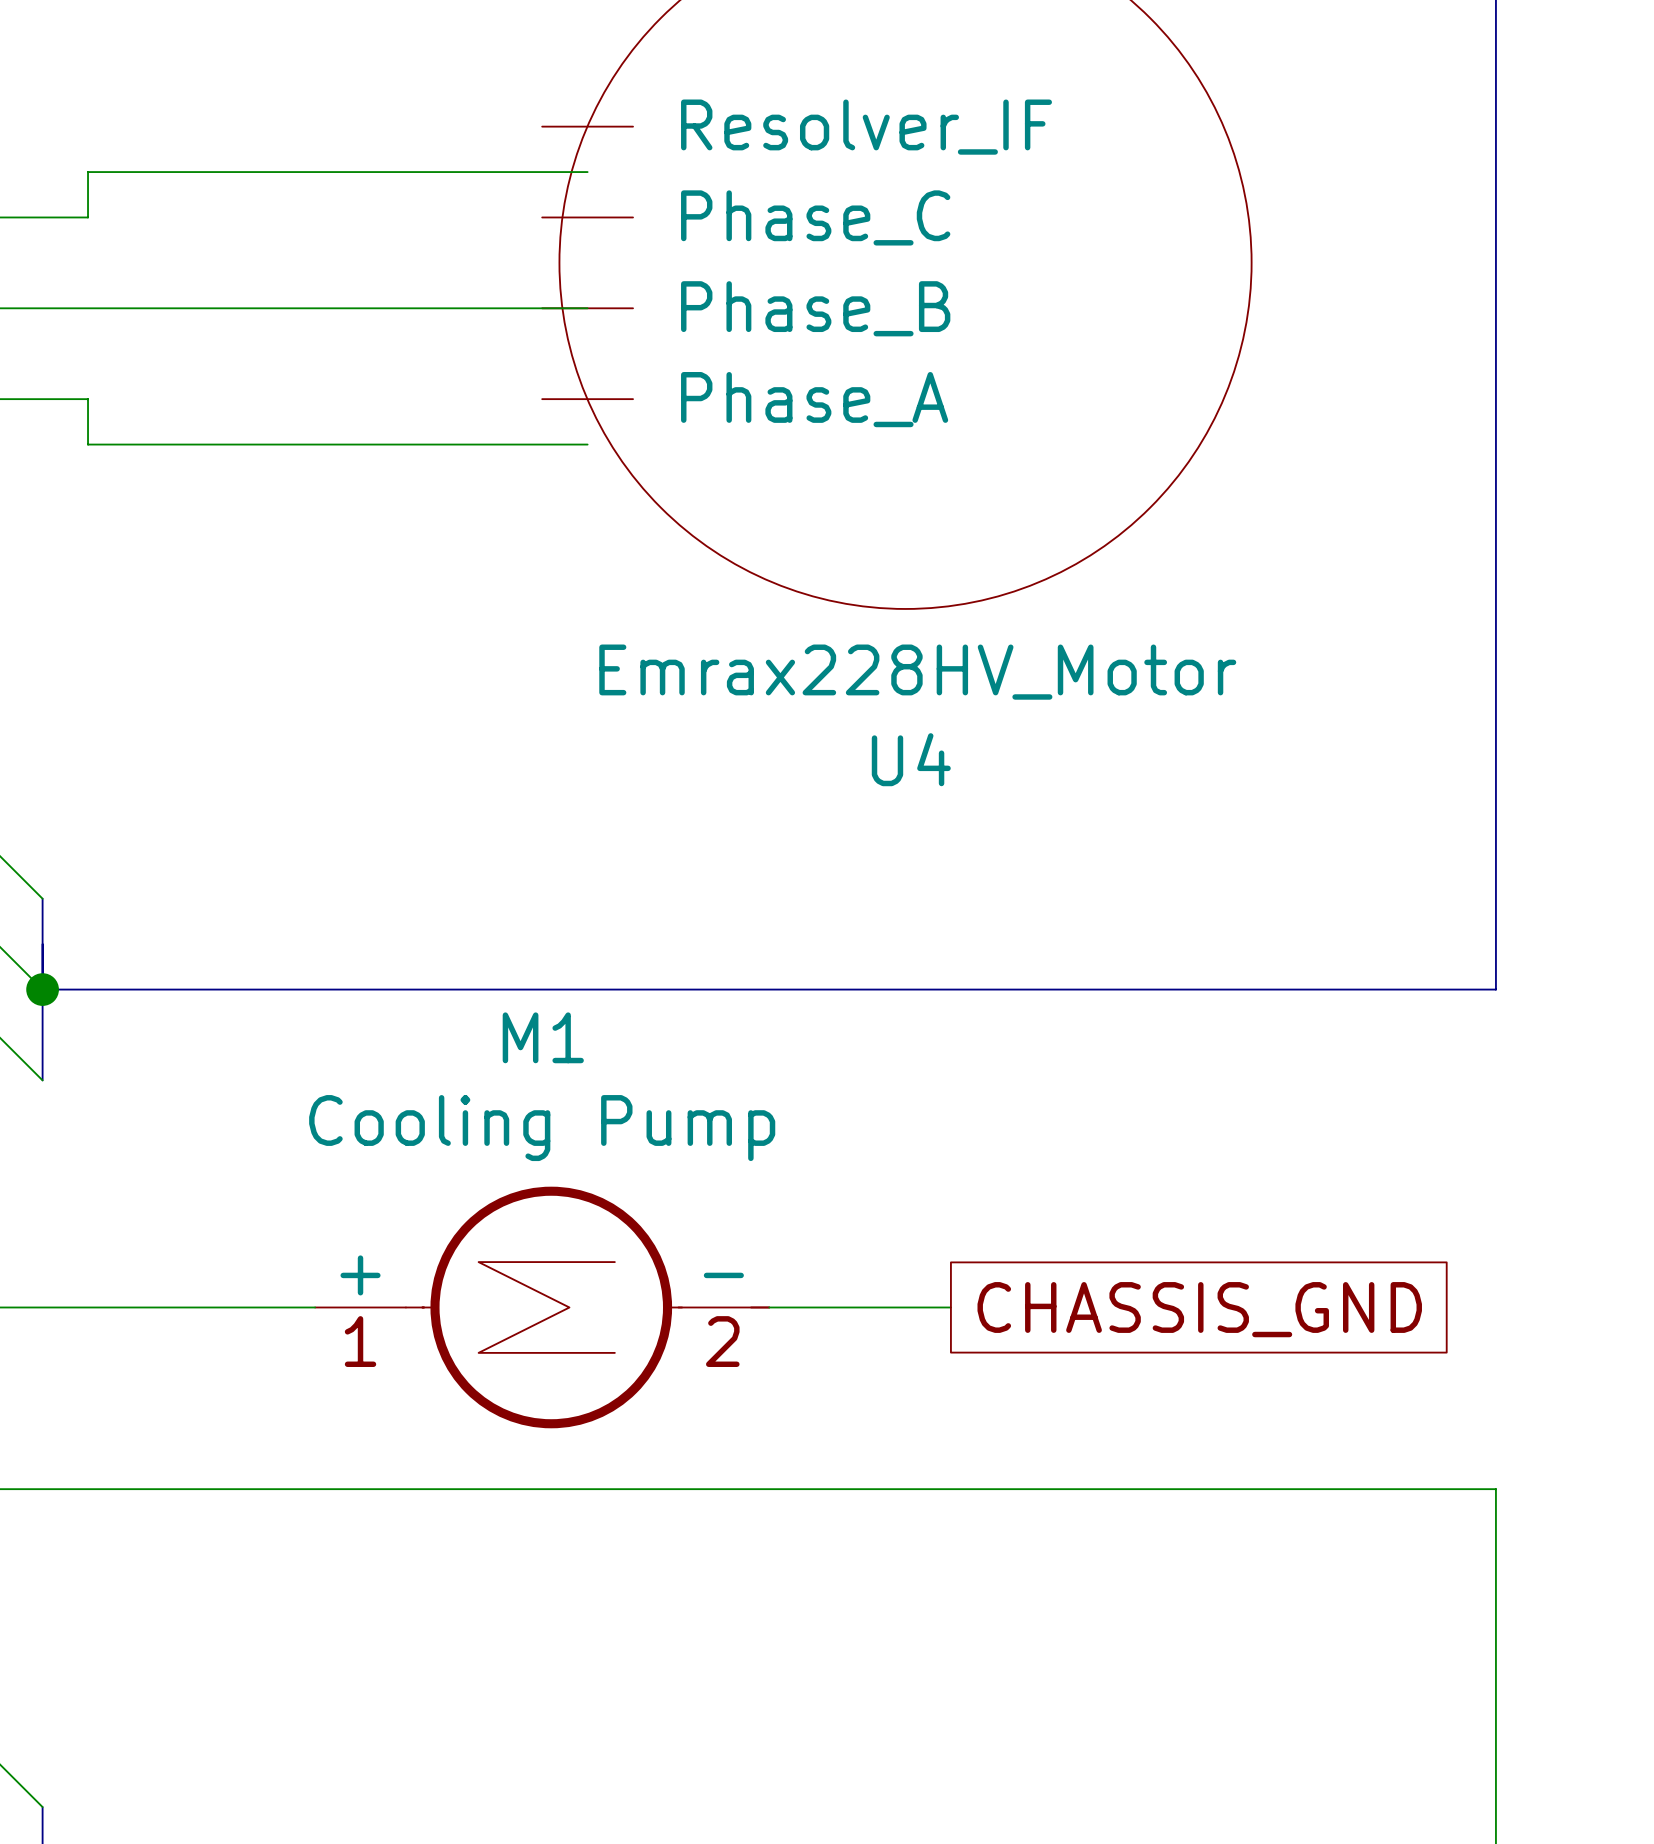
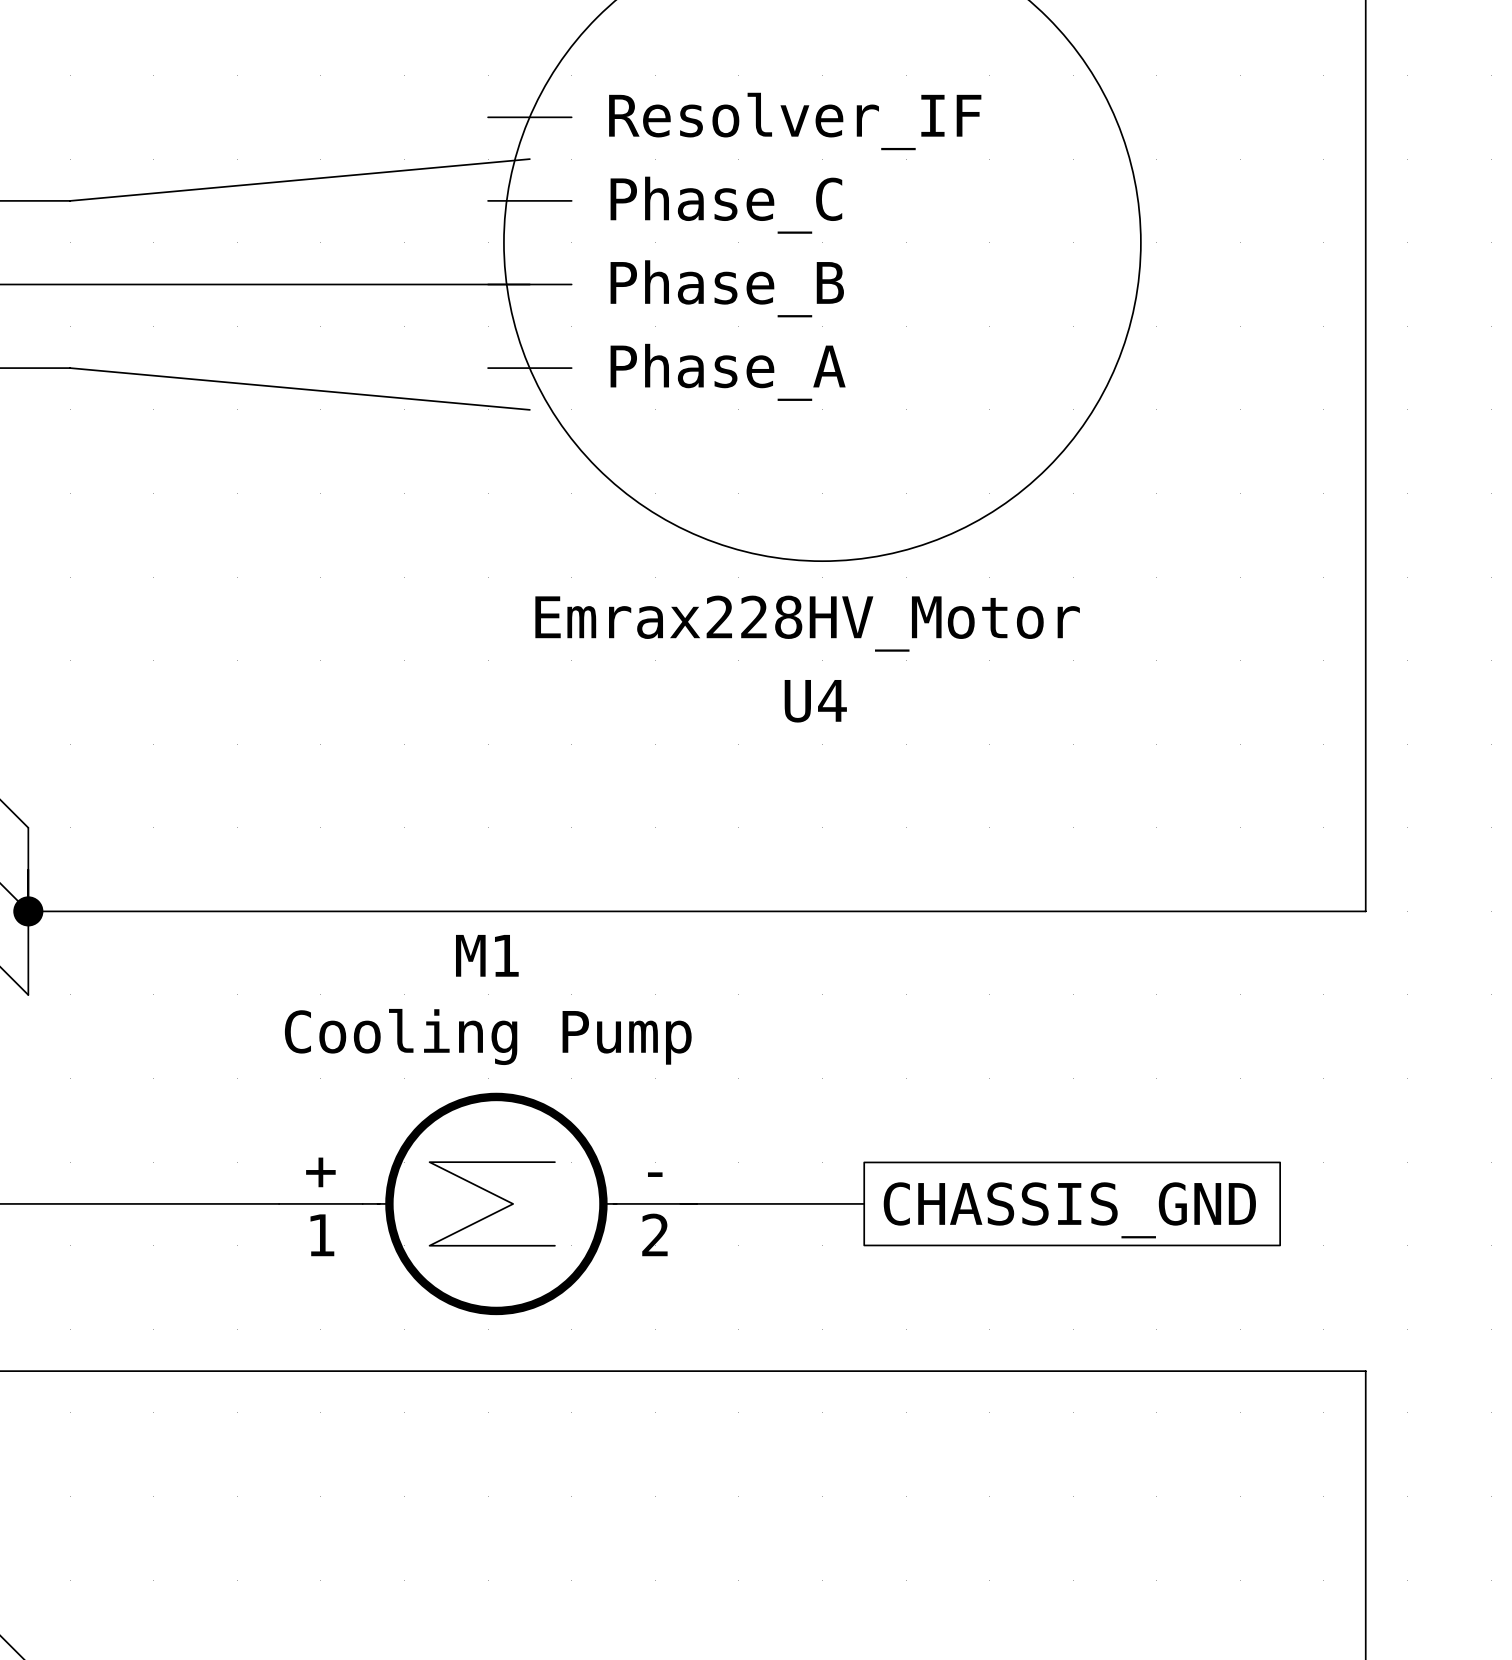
wire: (587, 172) (88, 172) (88, 217) -> (529, 159) (70, 200)
wire: (88, 399) (88, 444) (587, 444) -> (70, 368) (529, 409)

